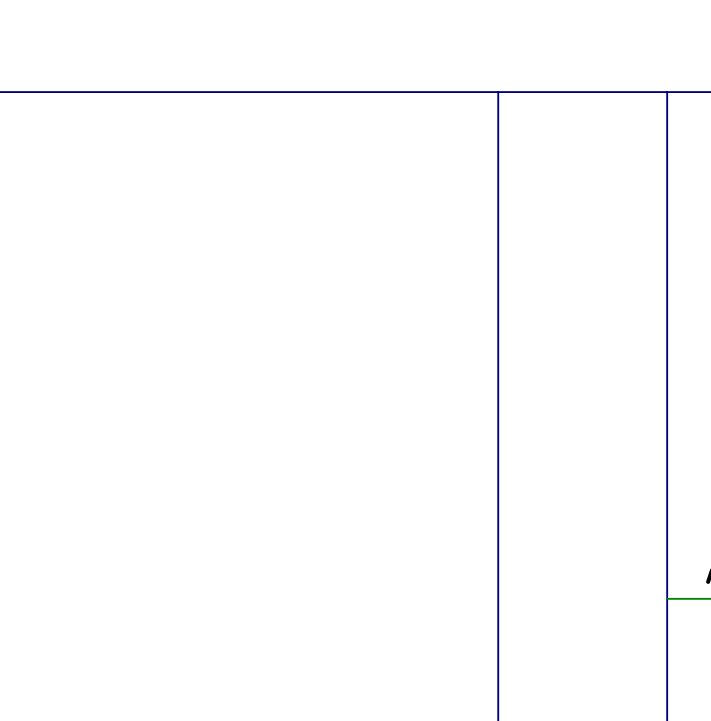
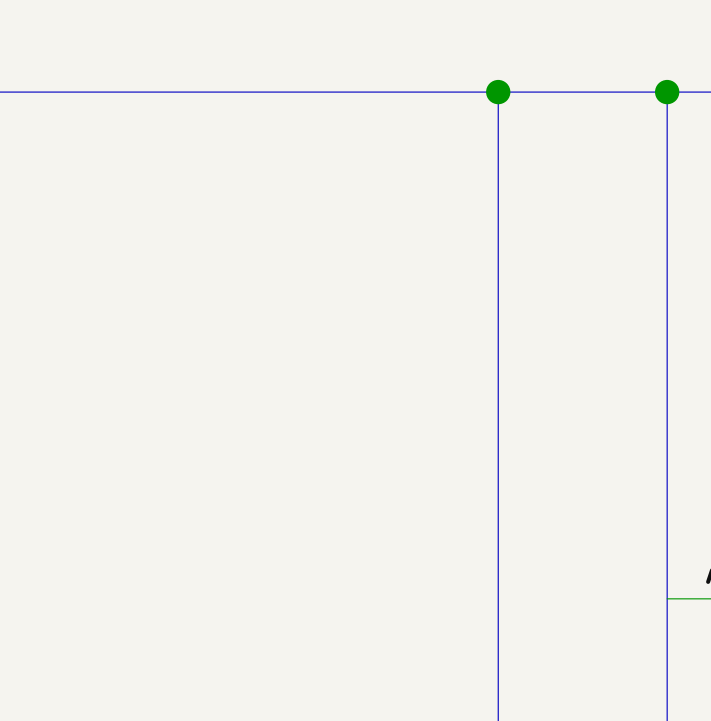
junction: none -> (498, 92)
junction: none -> (667, 92)

